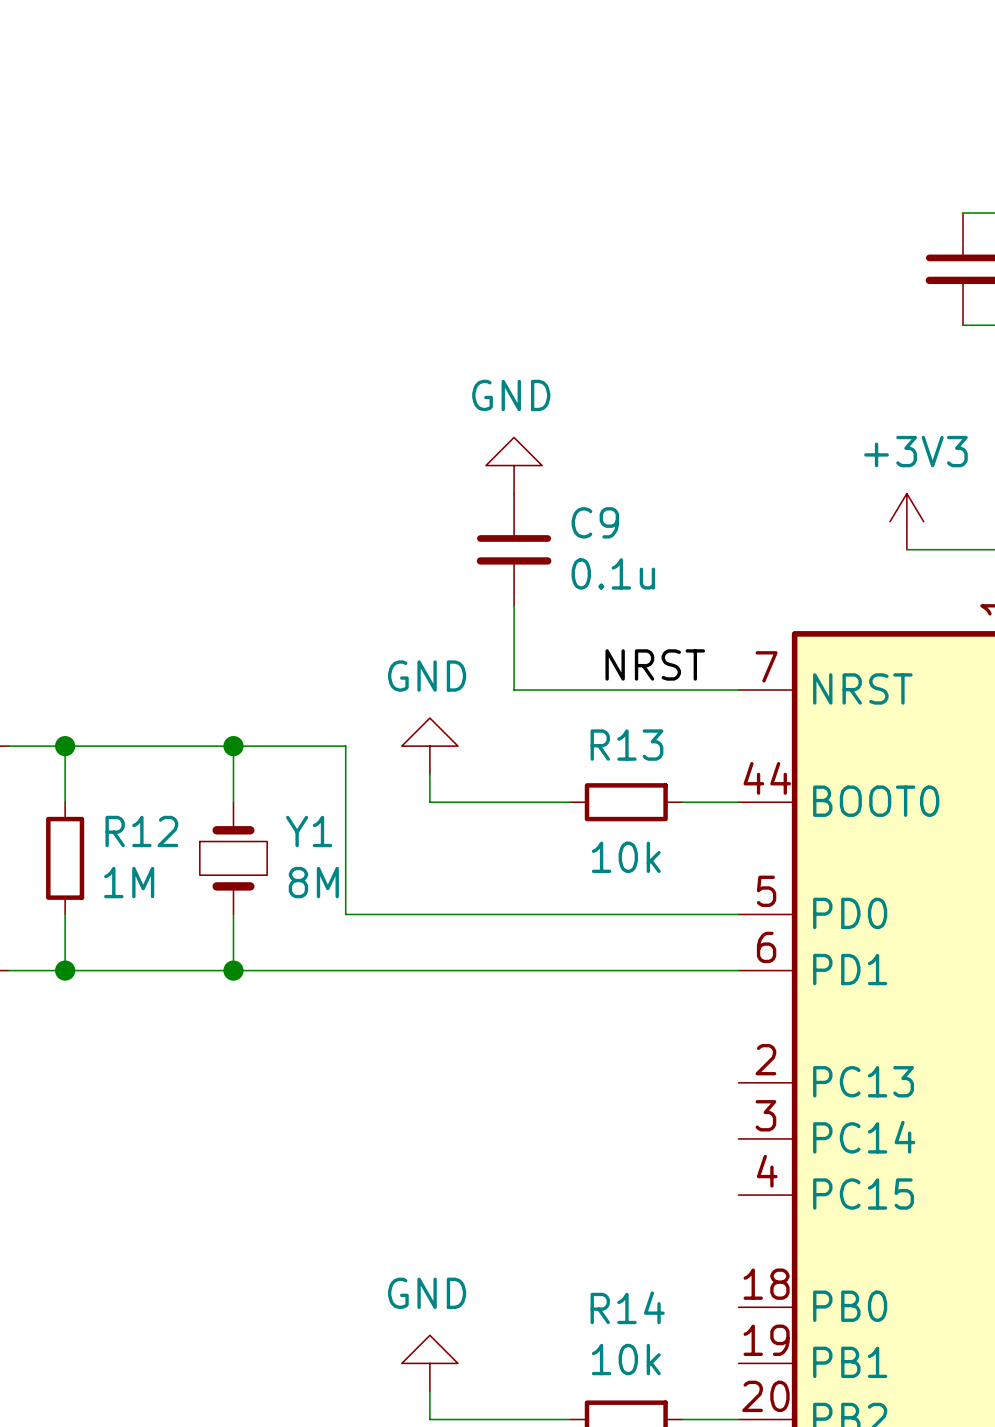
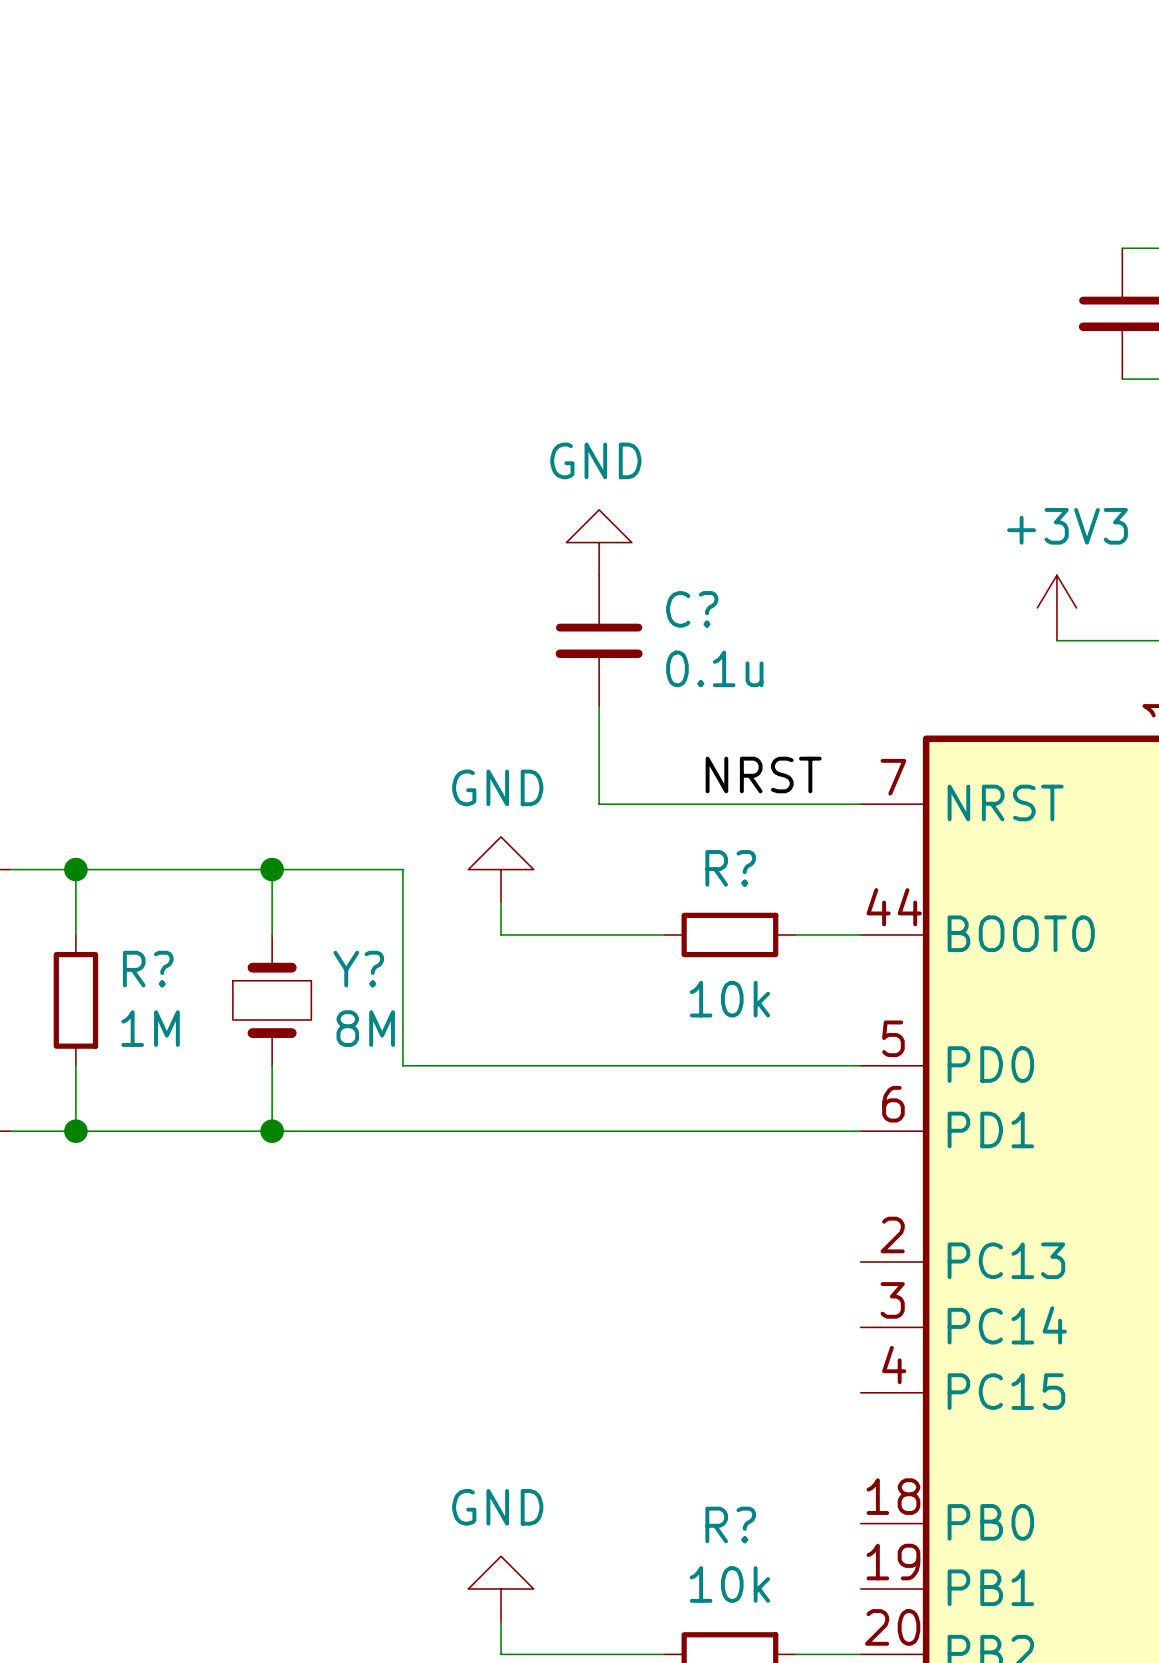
C9 name: C9 (595, 522) -> C? (692, 609)
R13 name: R13 (626, 745) -> R? (730, 868)
R12 name: R12 (141, 831) -> R? (148, 969)
Y1 name: Y1 (309, 831) -> Y? (358, 969)
R14 name: R14 (627, 1307) -> R? (730, 1524)

